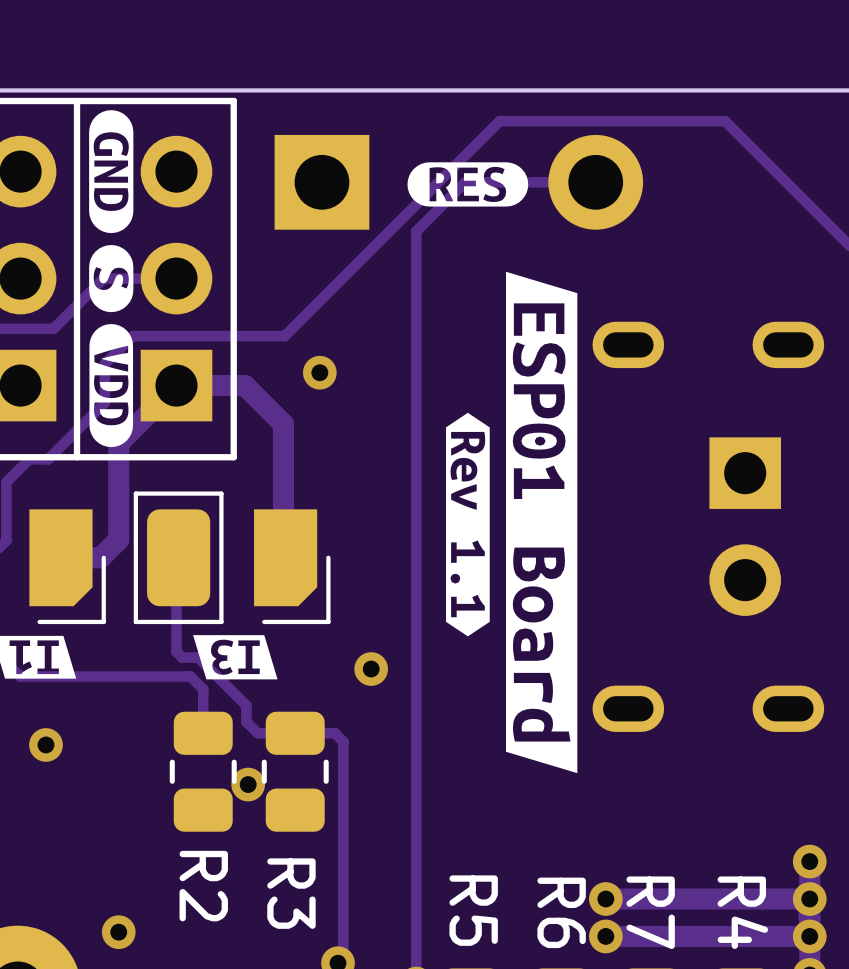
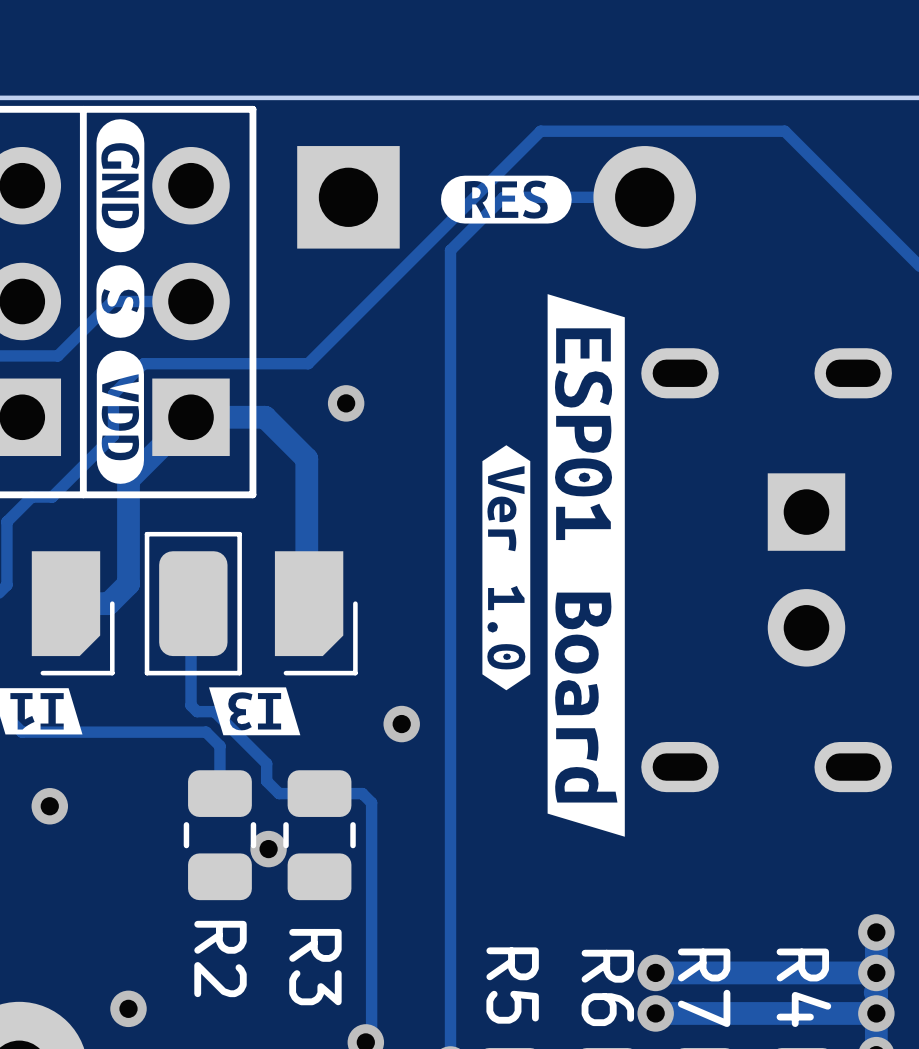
drawing shape: [445, 412, 490, 637] -> [482, 445, 531, 691]

